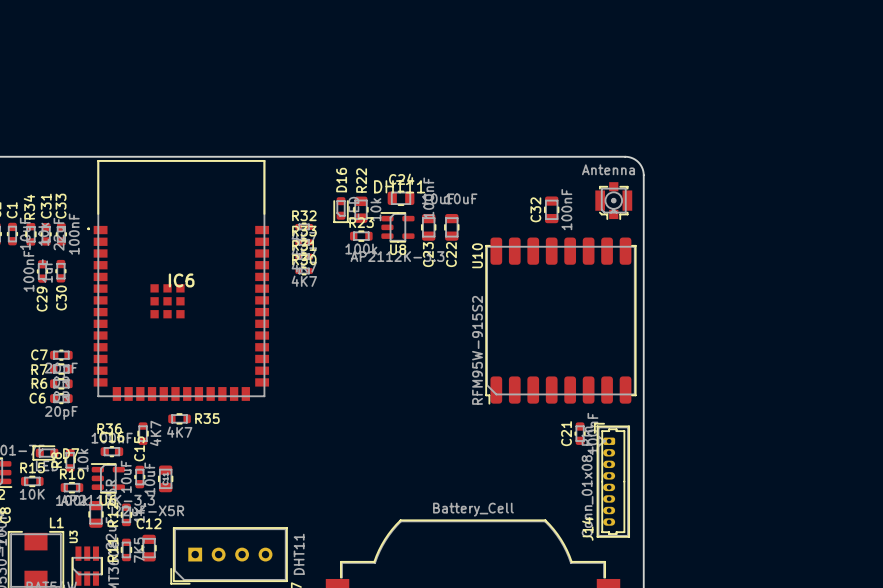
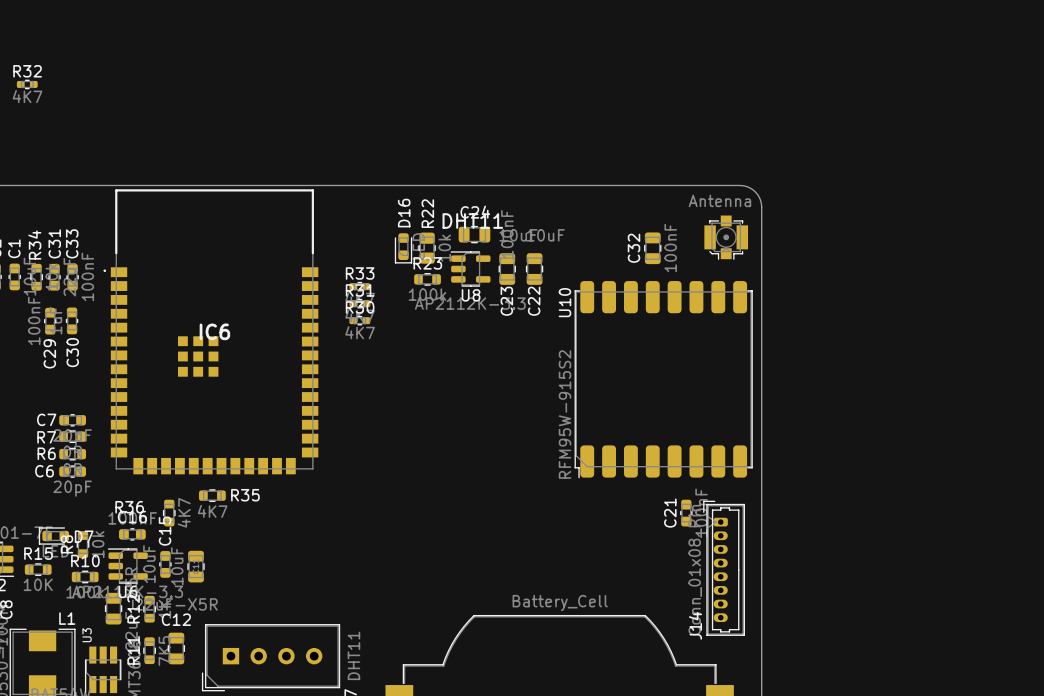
R32 position: (304, 226) -> (27, 84)

